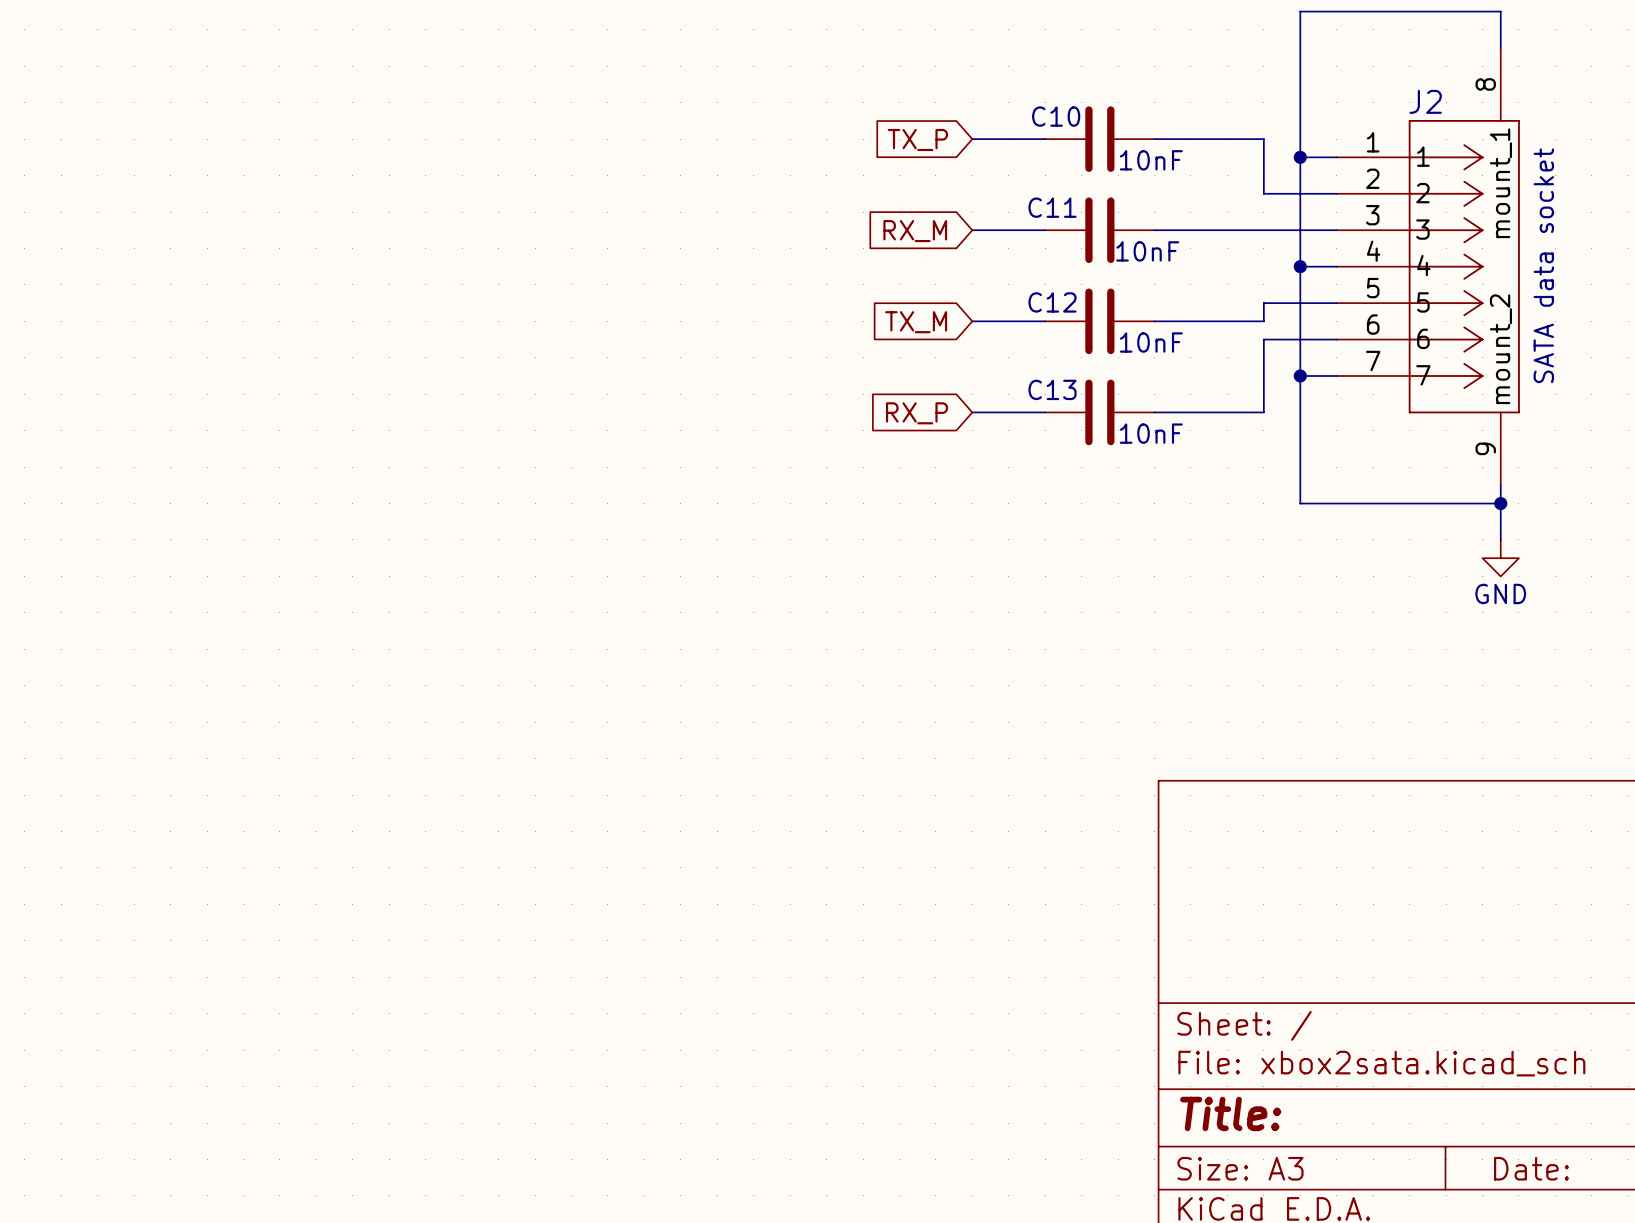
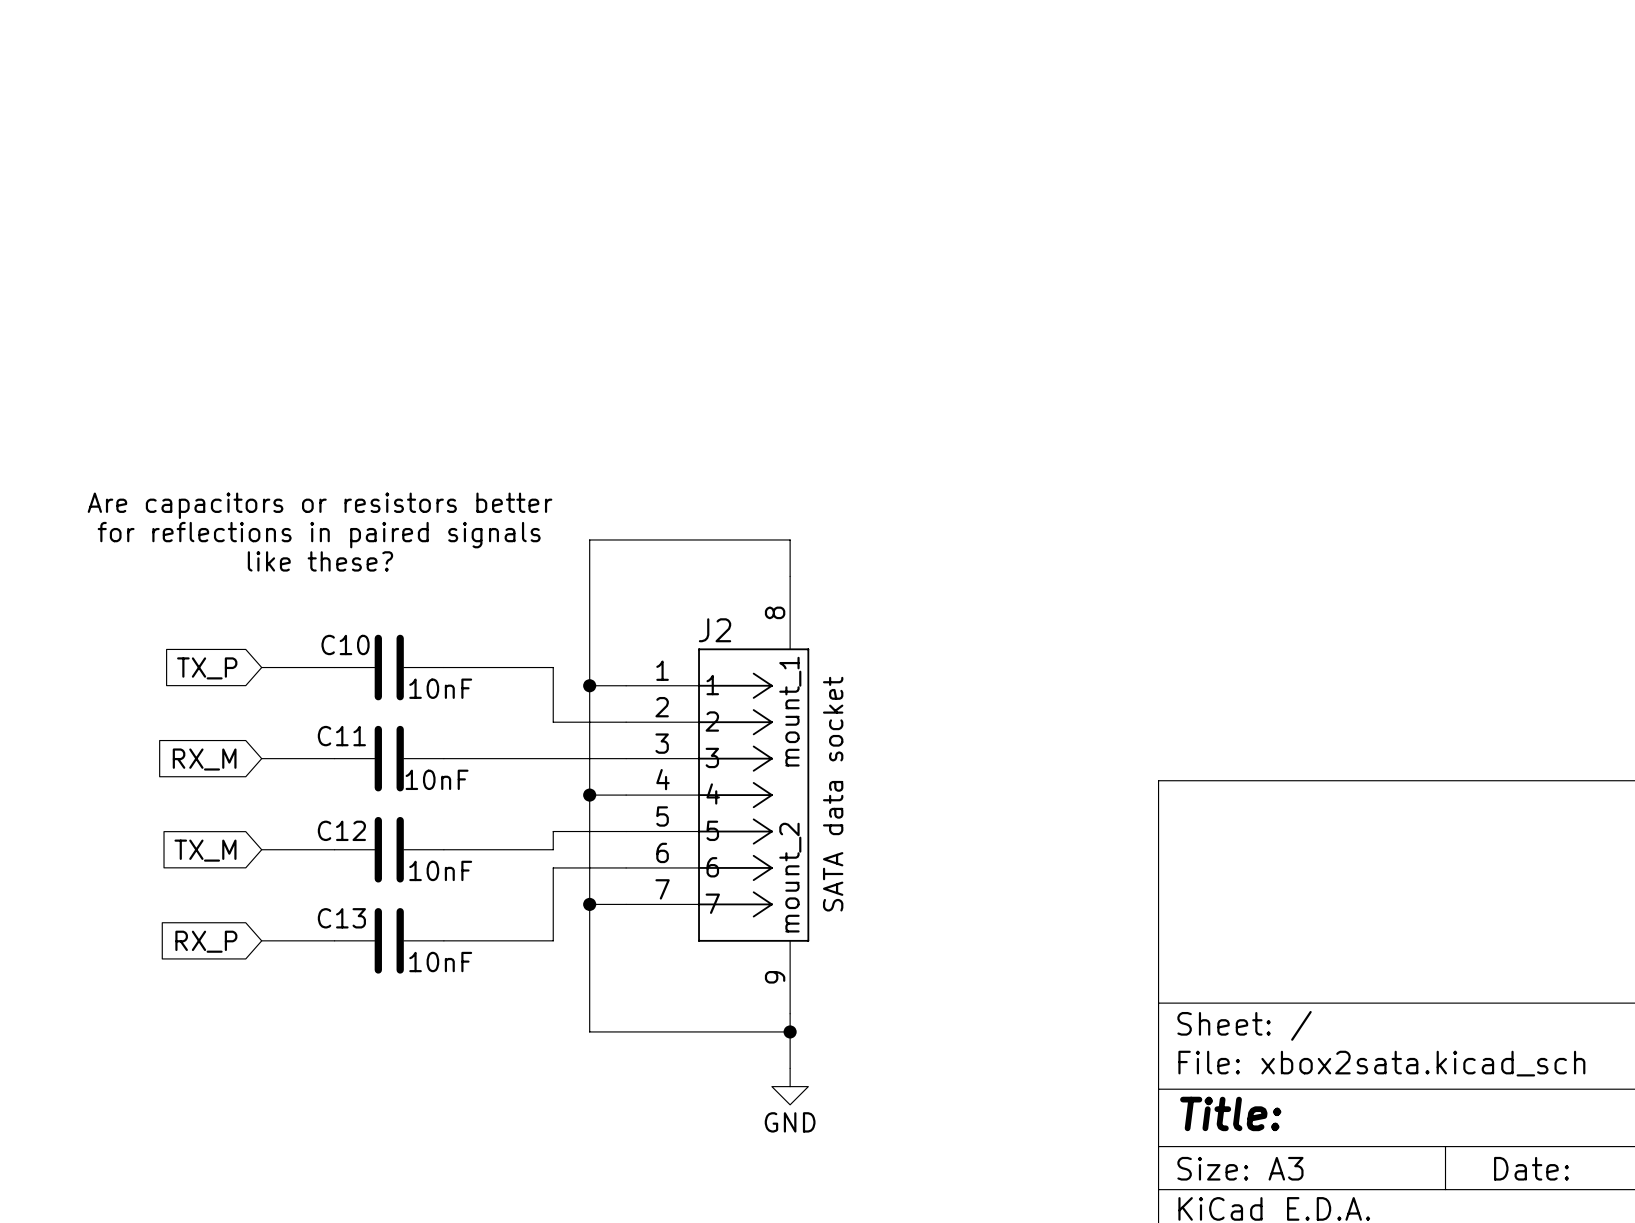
wire: (1500, 48) (1500, 11) (1300, 11) (1300, 503) (1500, 503) -> none
global label: TX_P (917, 139) -> none
wire: (972, 139) (1045, 139) -> none
C10 position: (1099, 139) -> (389, 667)
wire: (1154, 139) (1263, 139) (1263, 193) (1336, 193) -> none
wire: (1300, 157) (1336, 157) -> none
junction: (1300, 157) -> none
wire: (972, 230) (1045, 230) -> none
C11 position: (1099, 230) -> (389, 758)
wire: (1154, 230) (1336, 230) -> none
global label: RX_M (915, 231) -> none
wire: (1300, 266) (1336, 266) -> none
junction: (1300, 266) -> none
J2 position: (1428, 266) -> (717, 795)
wire: (1336, 303) (1263, 303) (1263, 321) (1154, 321) -> none
wire: (972, 321) (1045, 321) -> none
C12 position: (1099, 321) -> (389, 849)
global label: TX_M (916, 322) -> none
wire: (1336, 339) (1263, 339) (1263, 412) (1154, 412) -> none
wire: (1300, 375) (1336, 375) -> none
junction: (1300, 375) -> none
wire: (972, 412) (1045, 412) -> none
C13 position: (1099, 412) -> (389, 940)
global label: RX_P (916, 413) -> none
wire: (1500, 485) (1500, 539) -> none
junction: (1500, 503) -> none
text: none -> Are capacitors or resistors better (320, 505)
text: none -> for reflections in paired signals (319, 535)
power symbol: GND (1500, 558) -> none
text: none -> like these? (320, 561)
wire: none -> (790, 576) (790, 539) (589, 539) (589, 1031) (790, 1031)
wire: none -> (261, 667) (334, 667)
wire: none -> (443, 667) (553, 667) (553, 722) (626, 722)
global label: none -> TX_P (207, 668)
wire: none -> (589, 685) (626, 685)
junction: none -> (589, 685)
wire: none -> (261, 758) (334, 758)
wire: none -> (443, 758) (626, 758)
global label: none -> RX_M (204, 759)
wire: none -> (589, 795) (626, 795)
junction: none -> (589, 795)
wire: none -> (626, 831) (553, 831) (553, 849) (443, 849)
wire: none -> (261, 849) (334, 849)
global label: none -> TX_M (205, 850)
wire: none -> (626, 867) (553, 867) (553, 940) (443, 940)
wire: none -> (589, 904) (626, 904)
junction: none -> (589, 904)
wire: none -> (261, 940) (334, 940)
global label: none -> RX_P (206, 941)
wire: none -> (790, 1013) (790, 1068)
junction: none -> (790, 1031)
power symbol: none -> GND (790, 1086)

